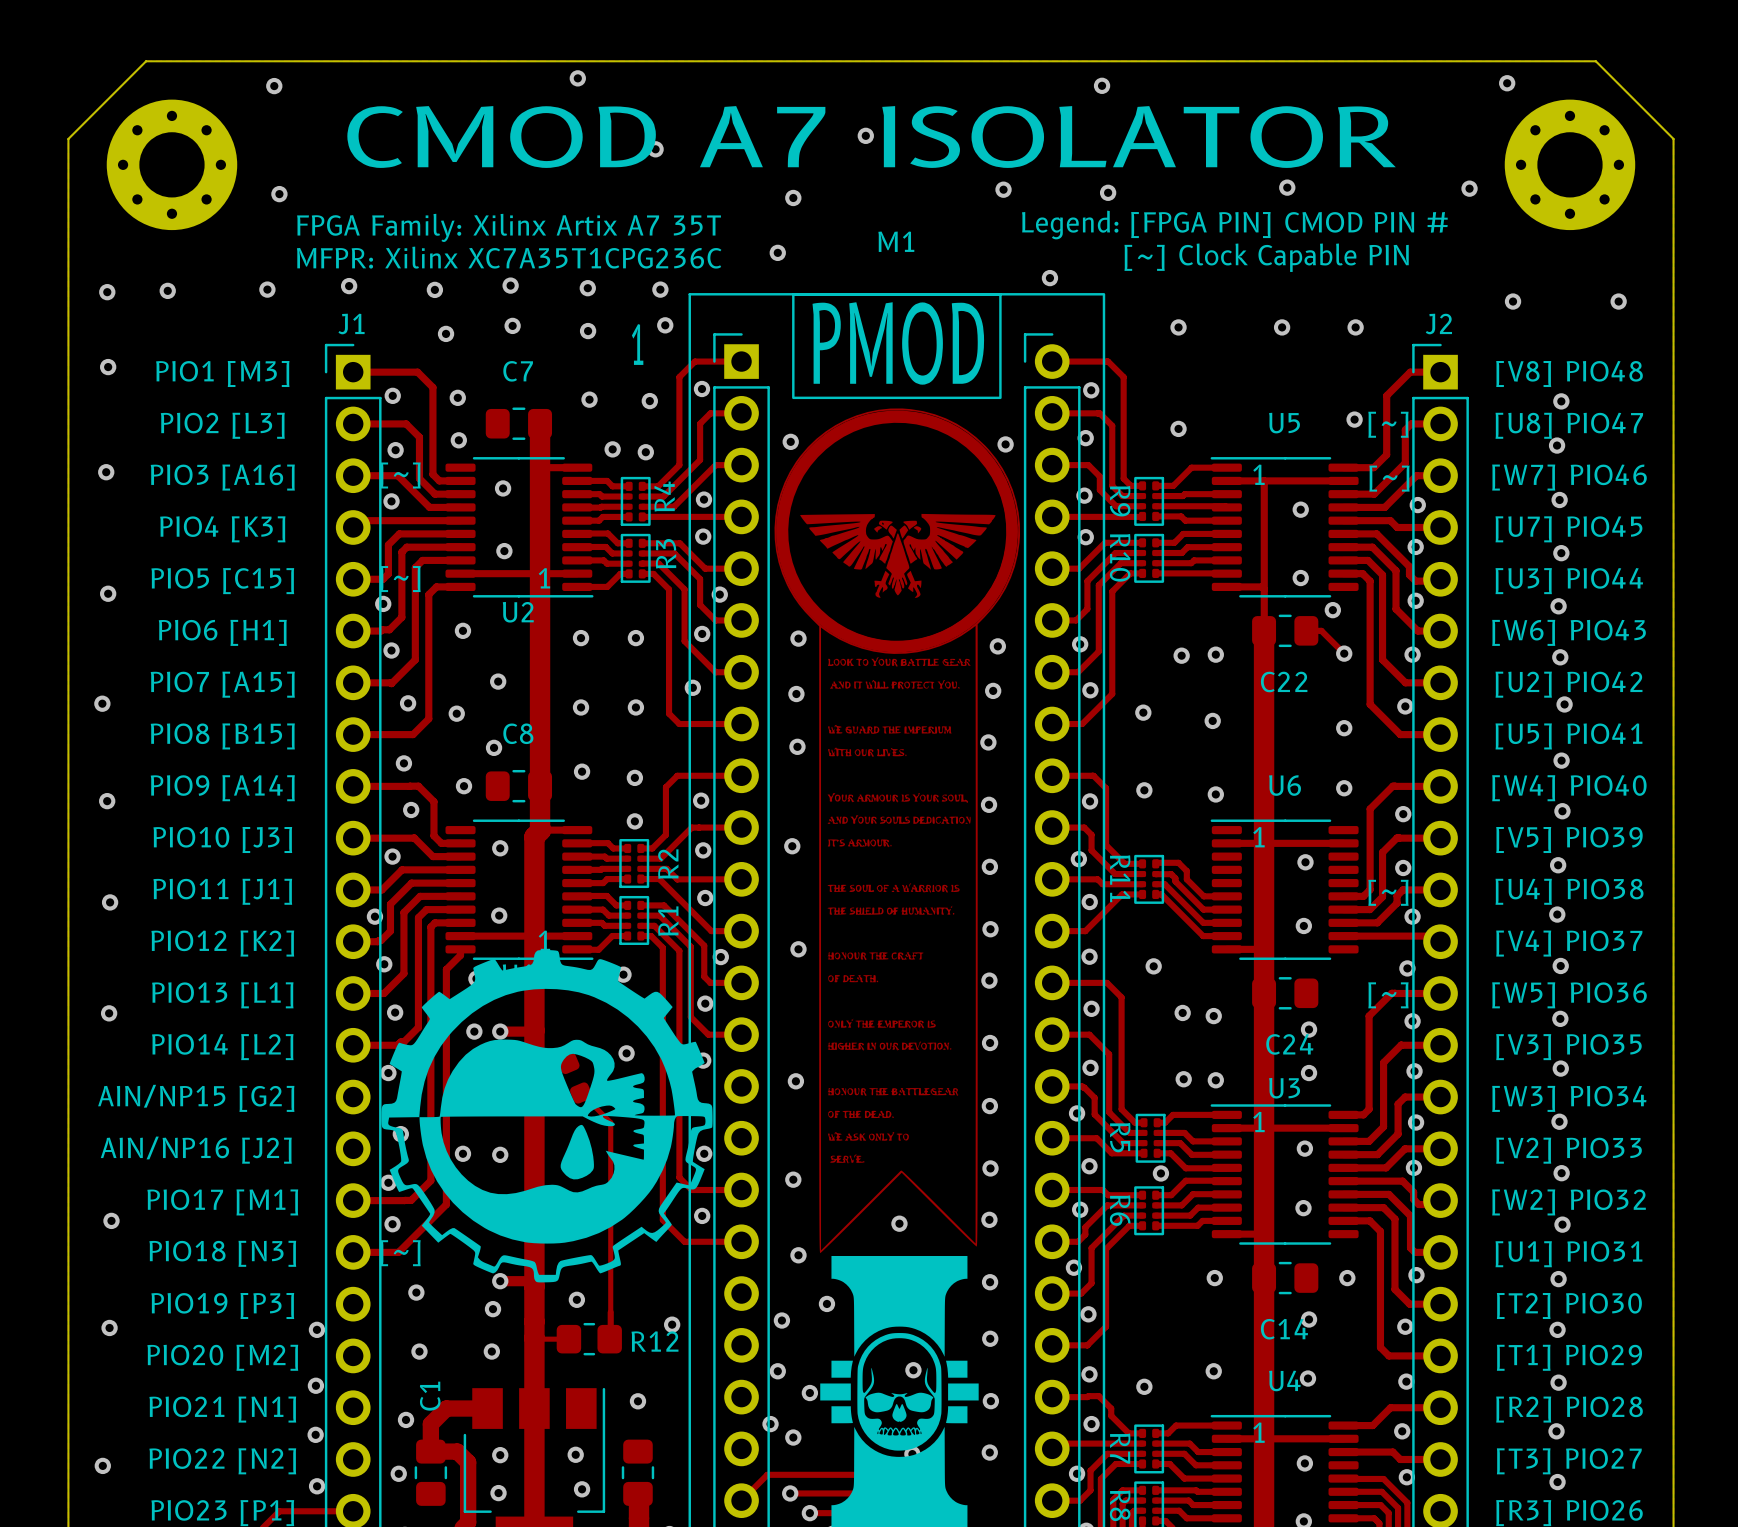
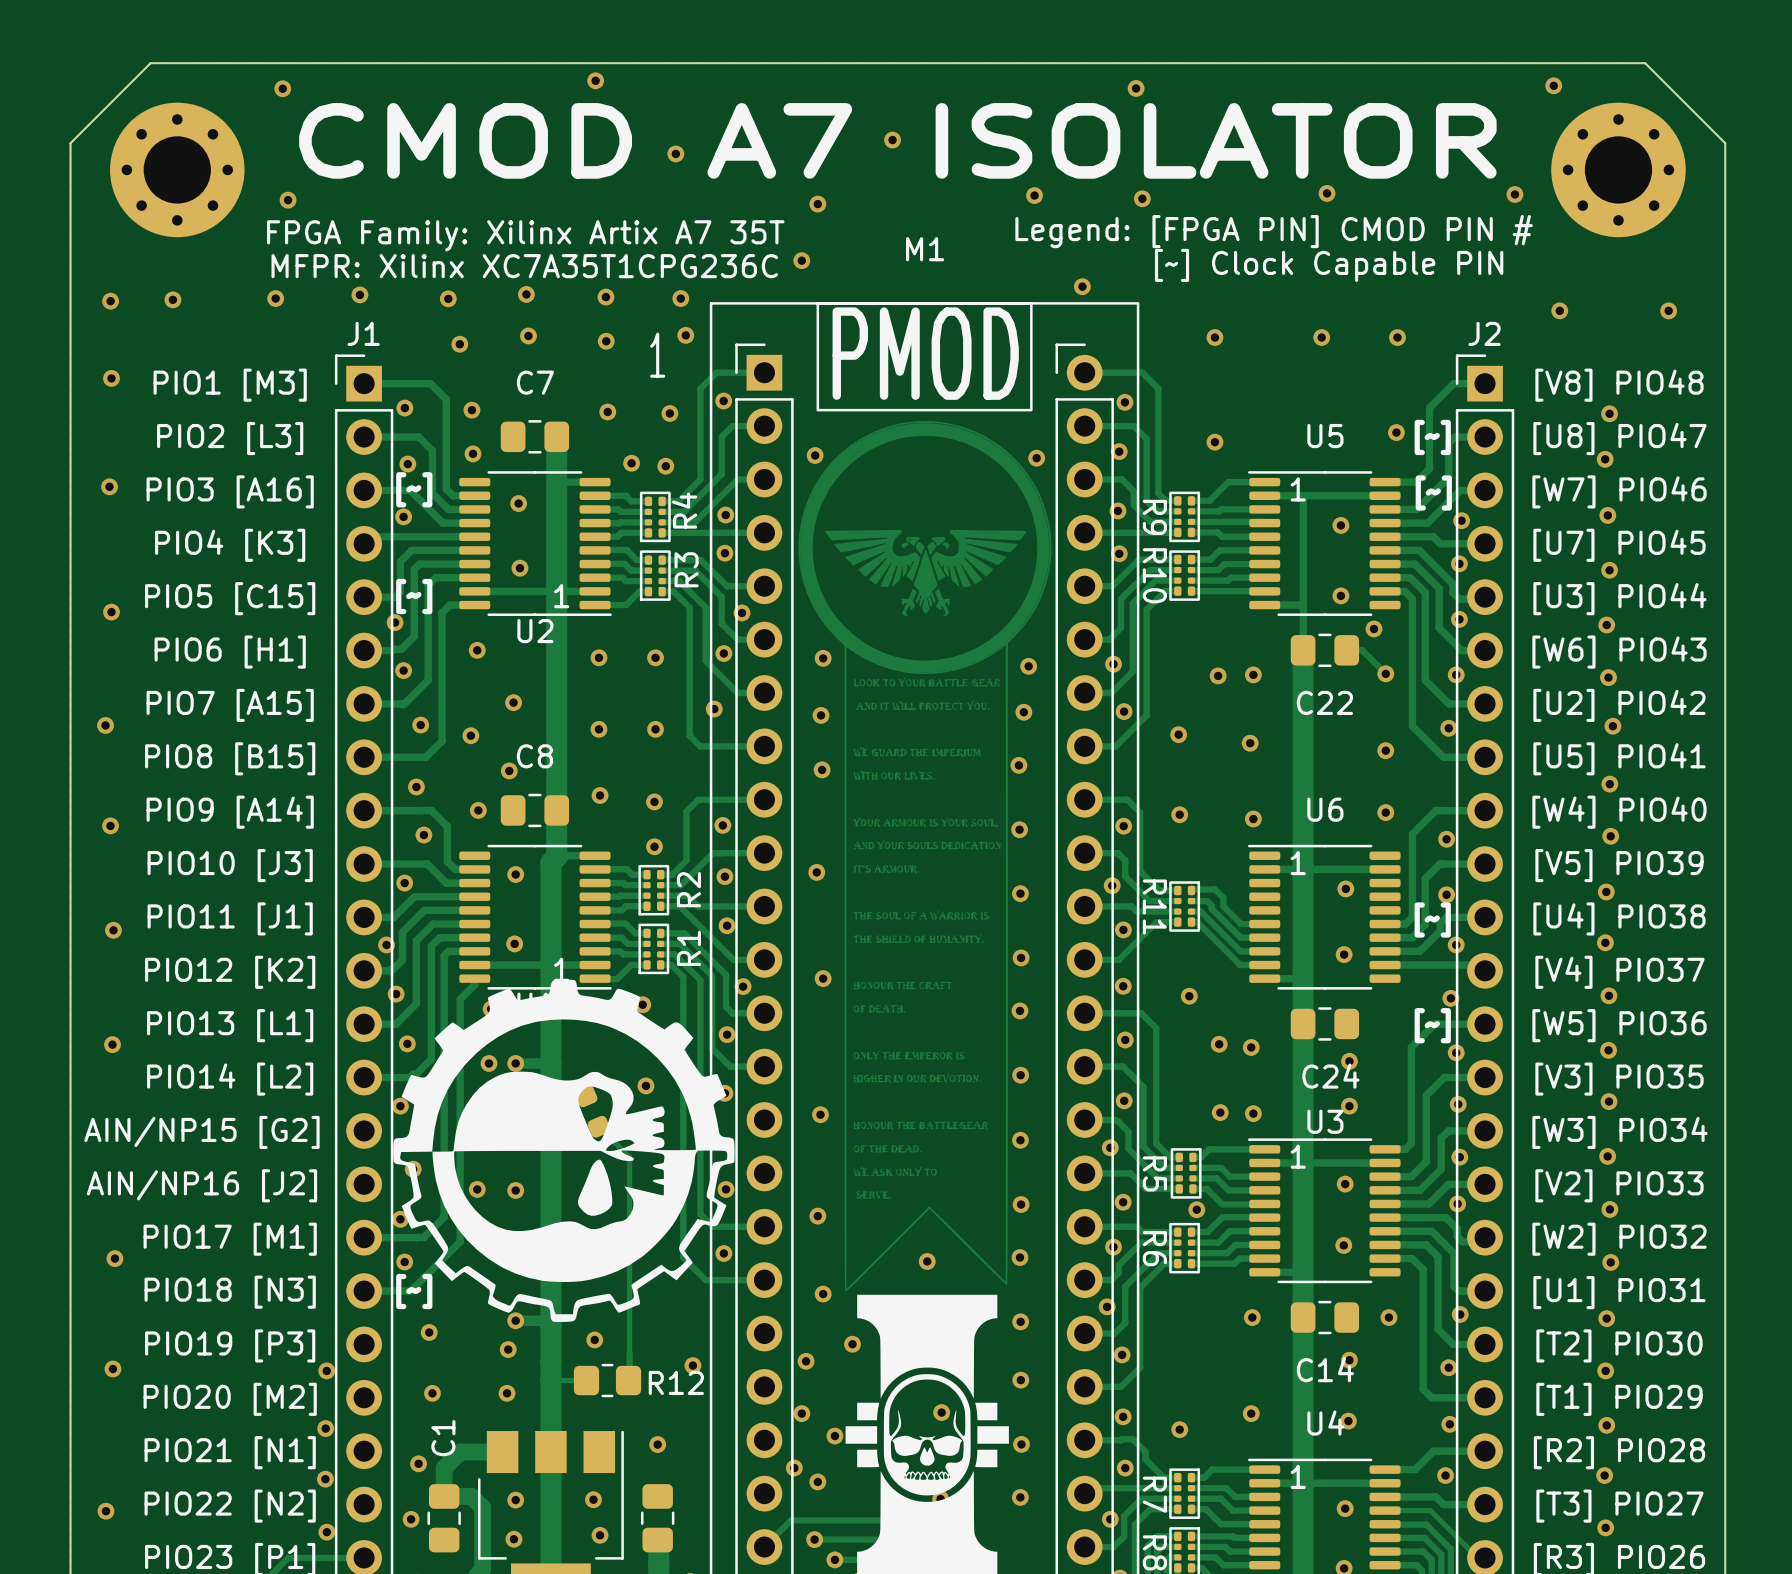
track: none -> (1385, 1510) (1430, 1510) (1477, 1557) (1485, 1557)
via: (1406, 1477) -> none

